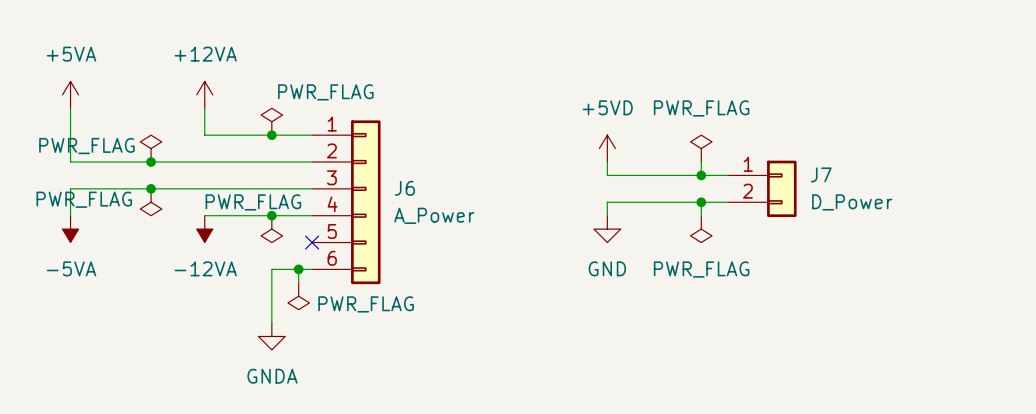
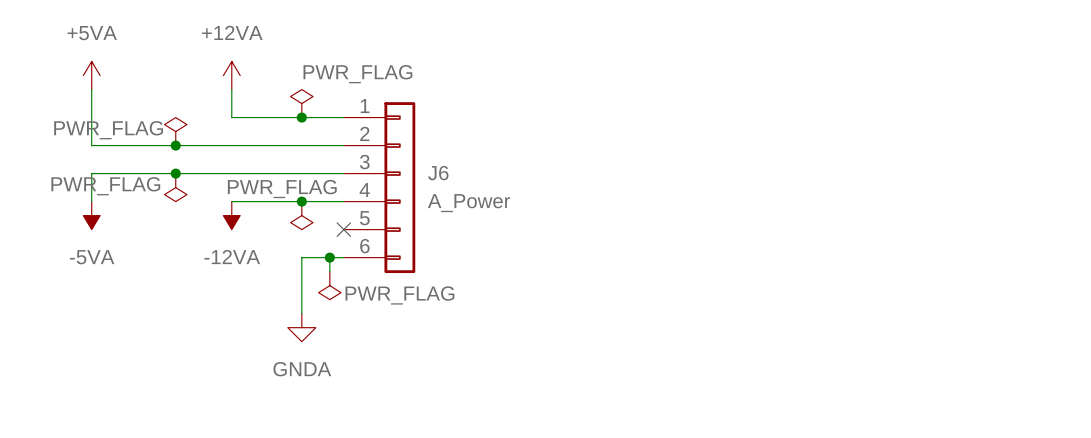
power symbol: +5VD (607, 148) -> none
power symbol: PWR_FLAG (701, 148) -> none
wire: (607, 162) (607, 175) (728, 175) -> none
wire: (701, 162) (701, 175) -> none
junction: (701, 175) -> none
J7: D_Power (762, 188) -> none
wire: (701, 202) (701, 215) -> none
junction: (701, 202) -> none
wire: (728, 202) (607, 202) (607, 215) -> none
power symbol: GND (607, 229) -> none
power symbol: PWR_FLAG (701, 229) -> none

